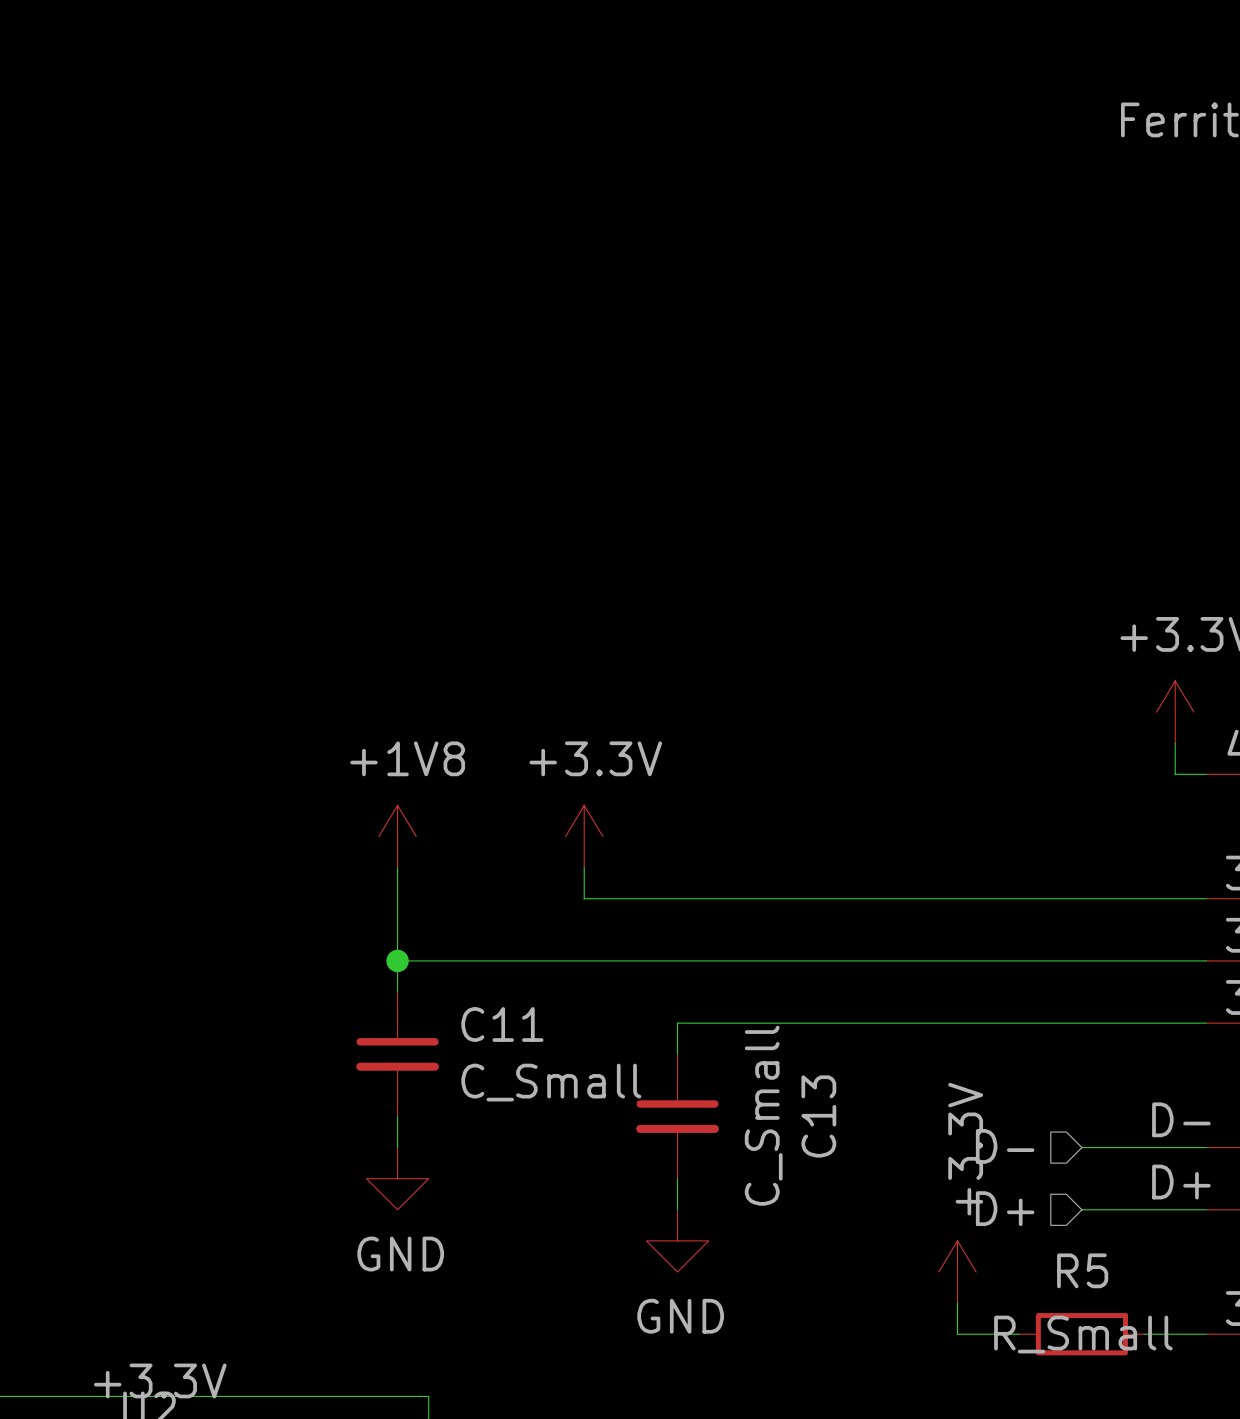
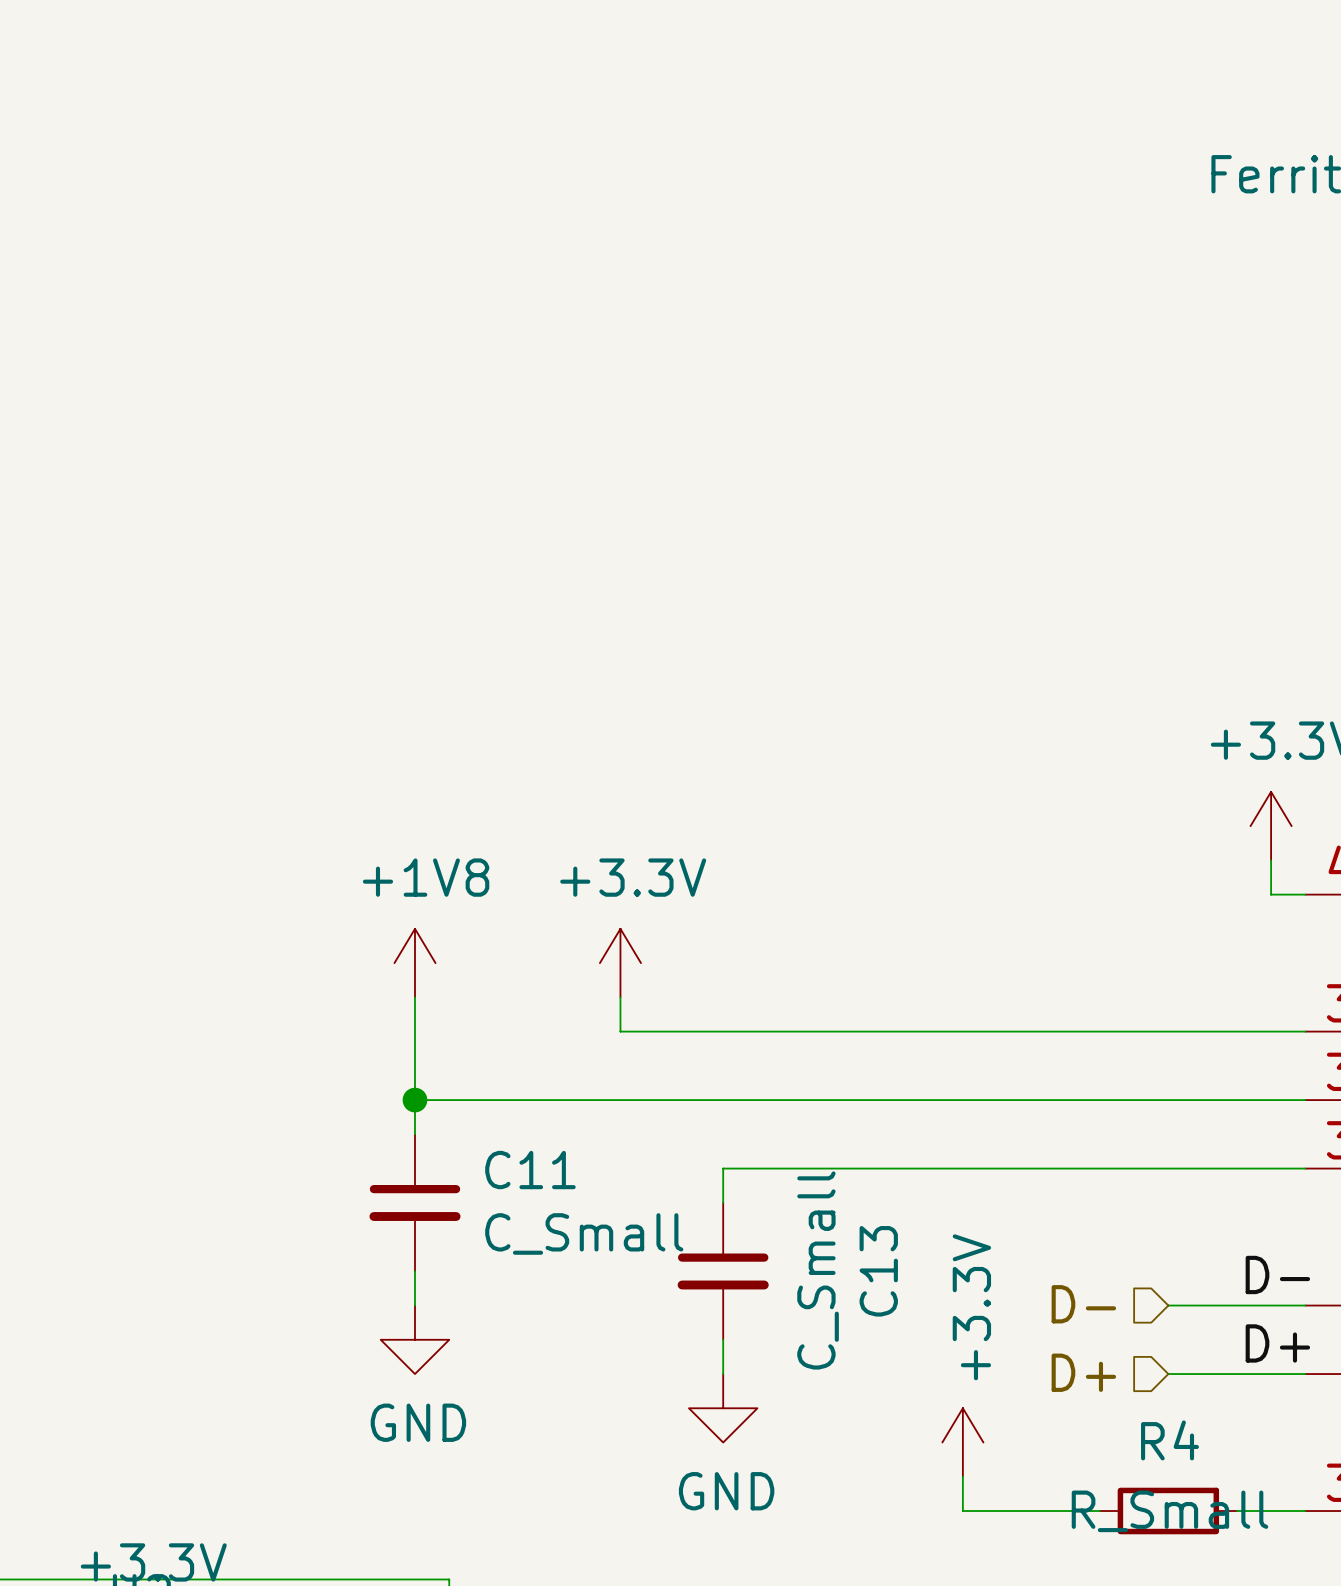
R5 name: R5 (1082, 1270) -> R4 (1169, 1440)
power symbol position: +3.3V (957, 1272) -> +3.3V (962, 1442)
wire: (957, 1303) (957, 1334) -> (962, 1476) (962, 1511) (1031, 1511)

